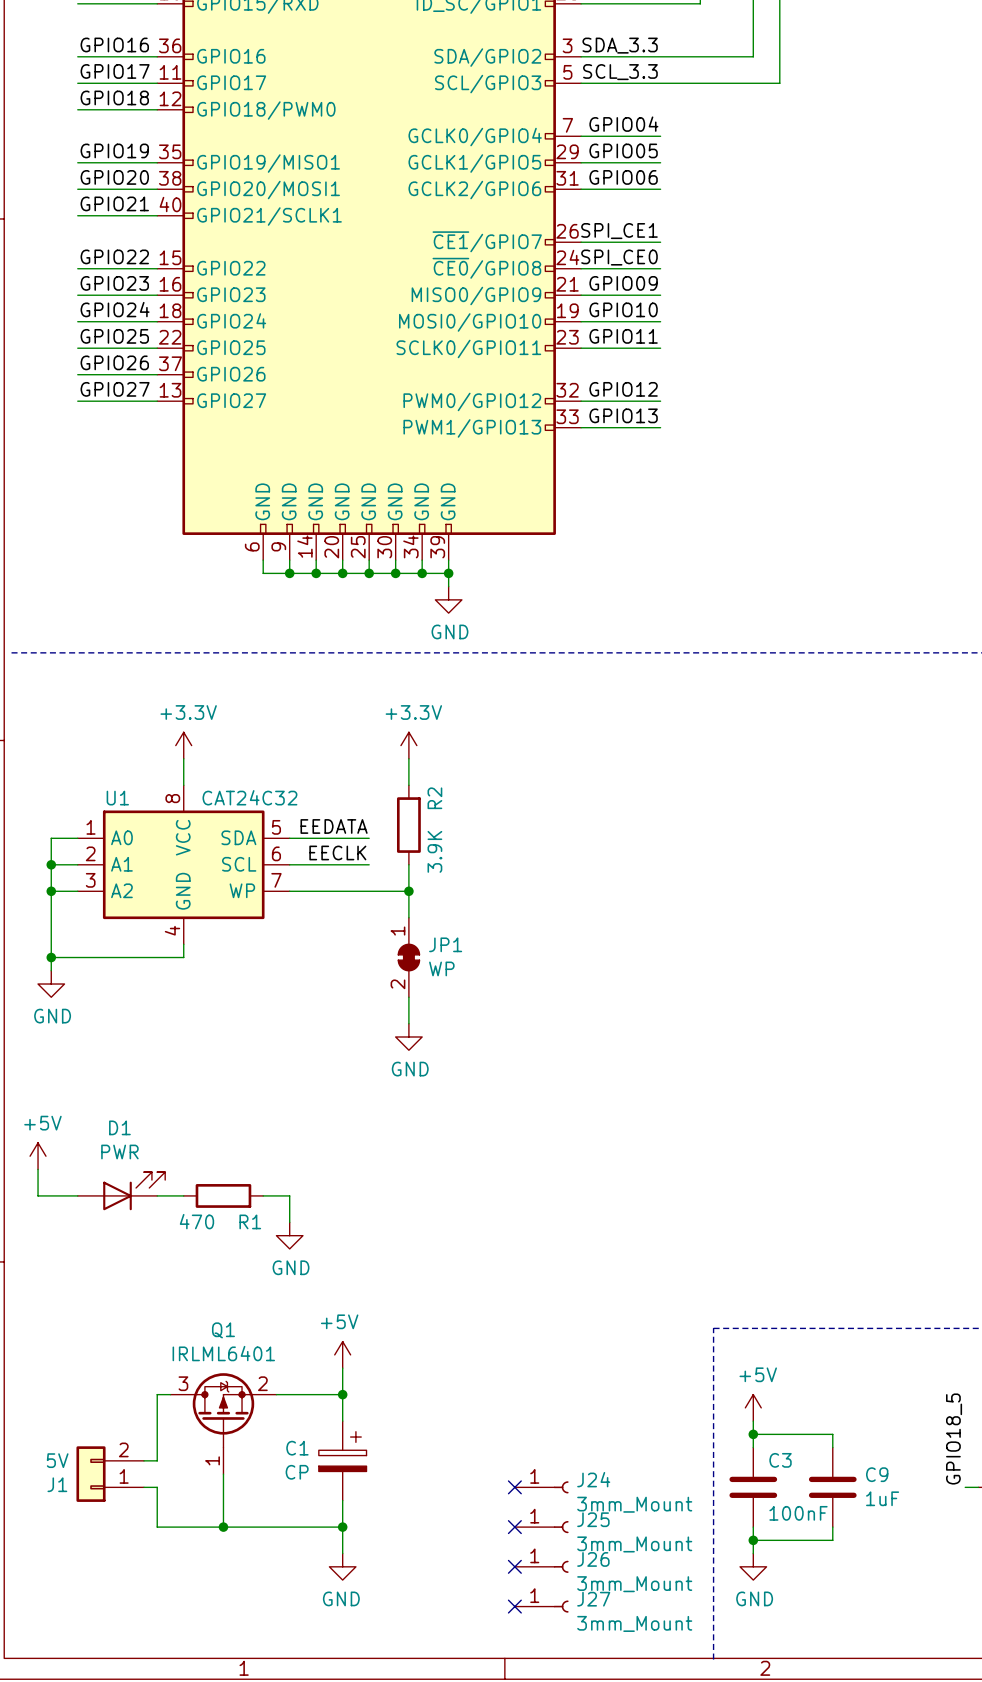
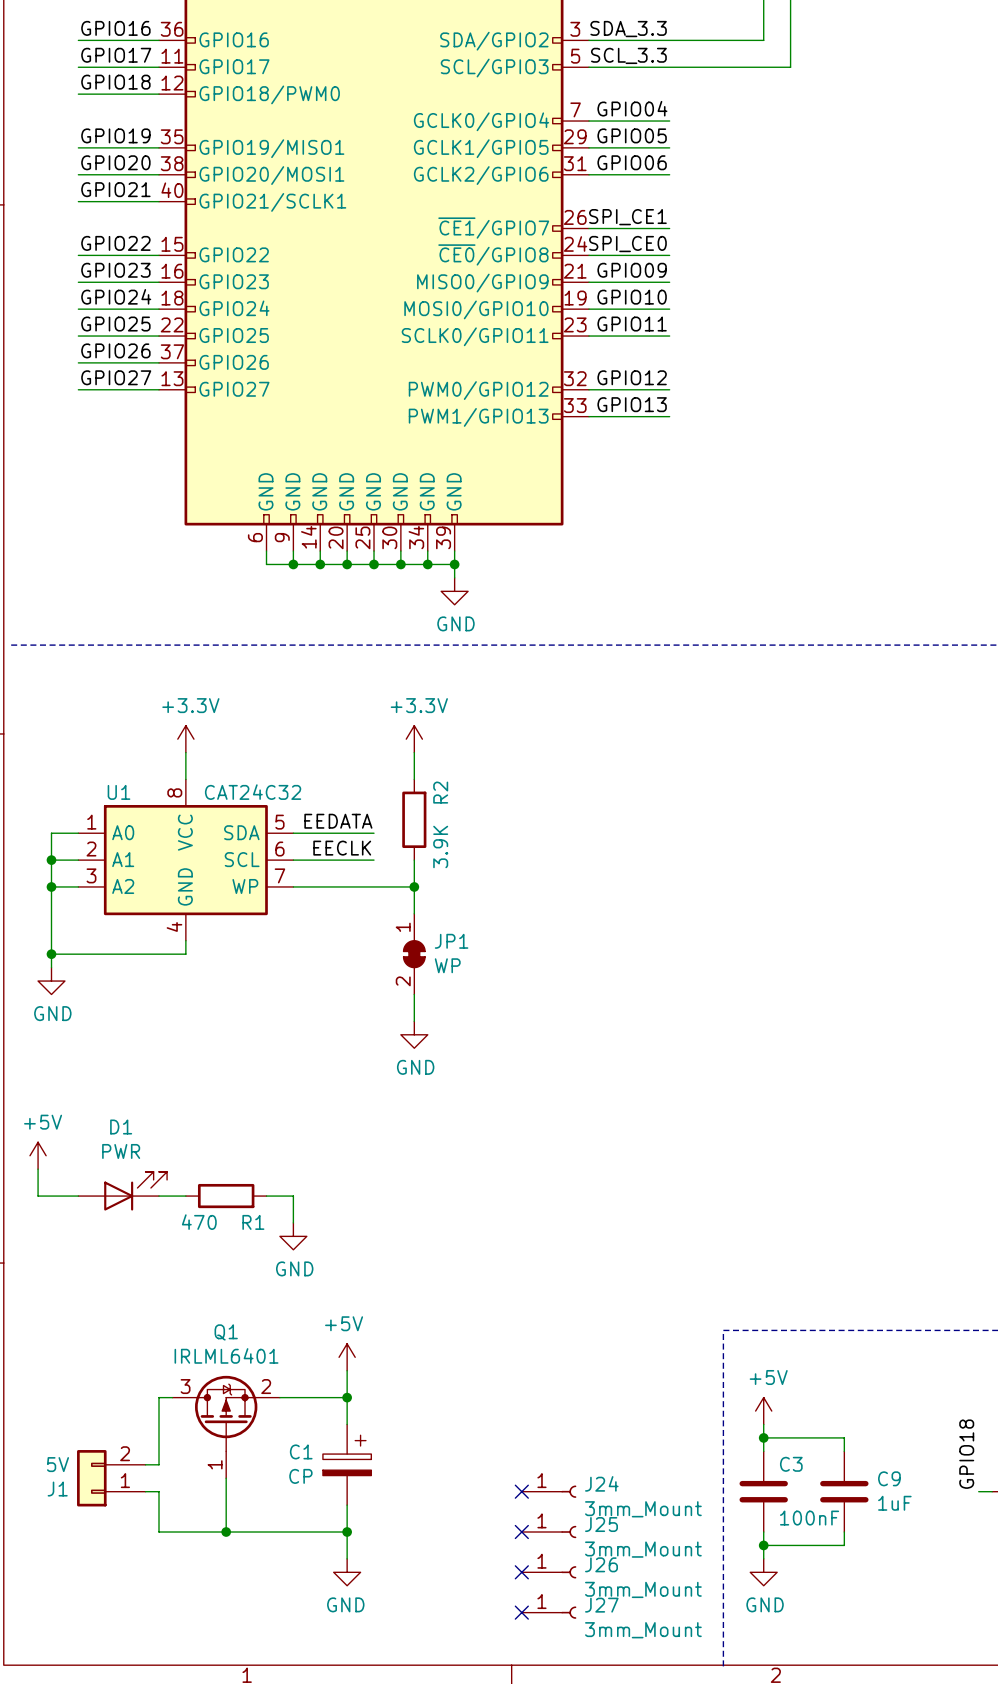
label: GPIO18_5 (954, 1439) -> GPIO18 (966, 1454)

